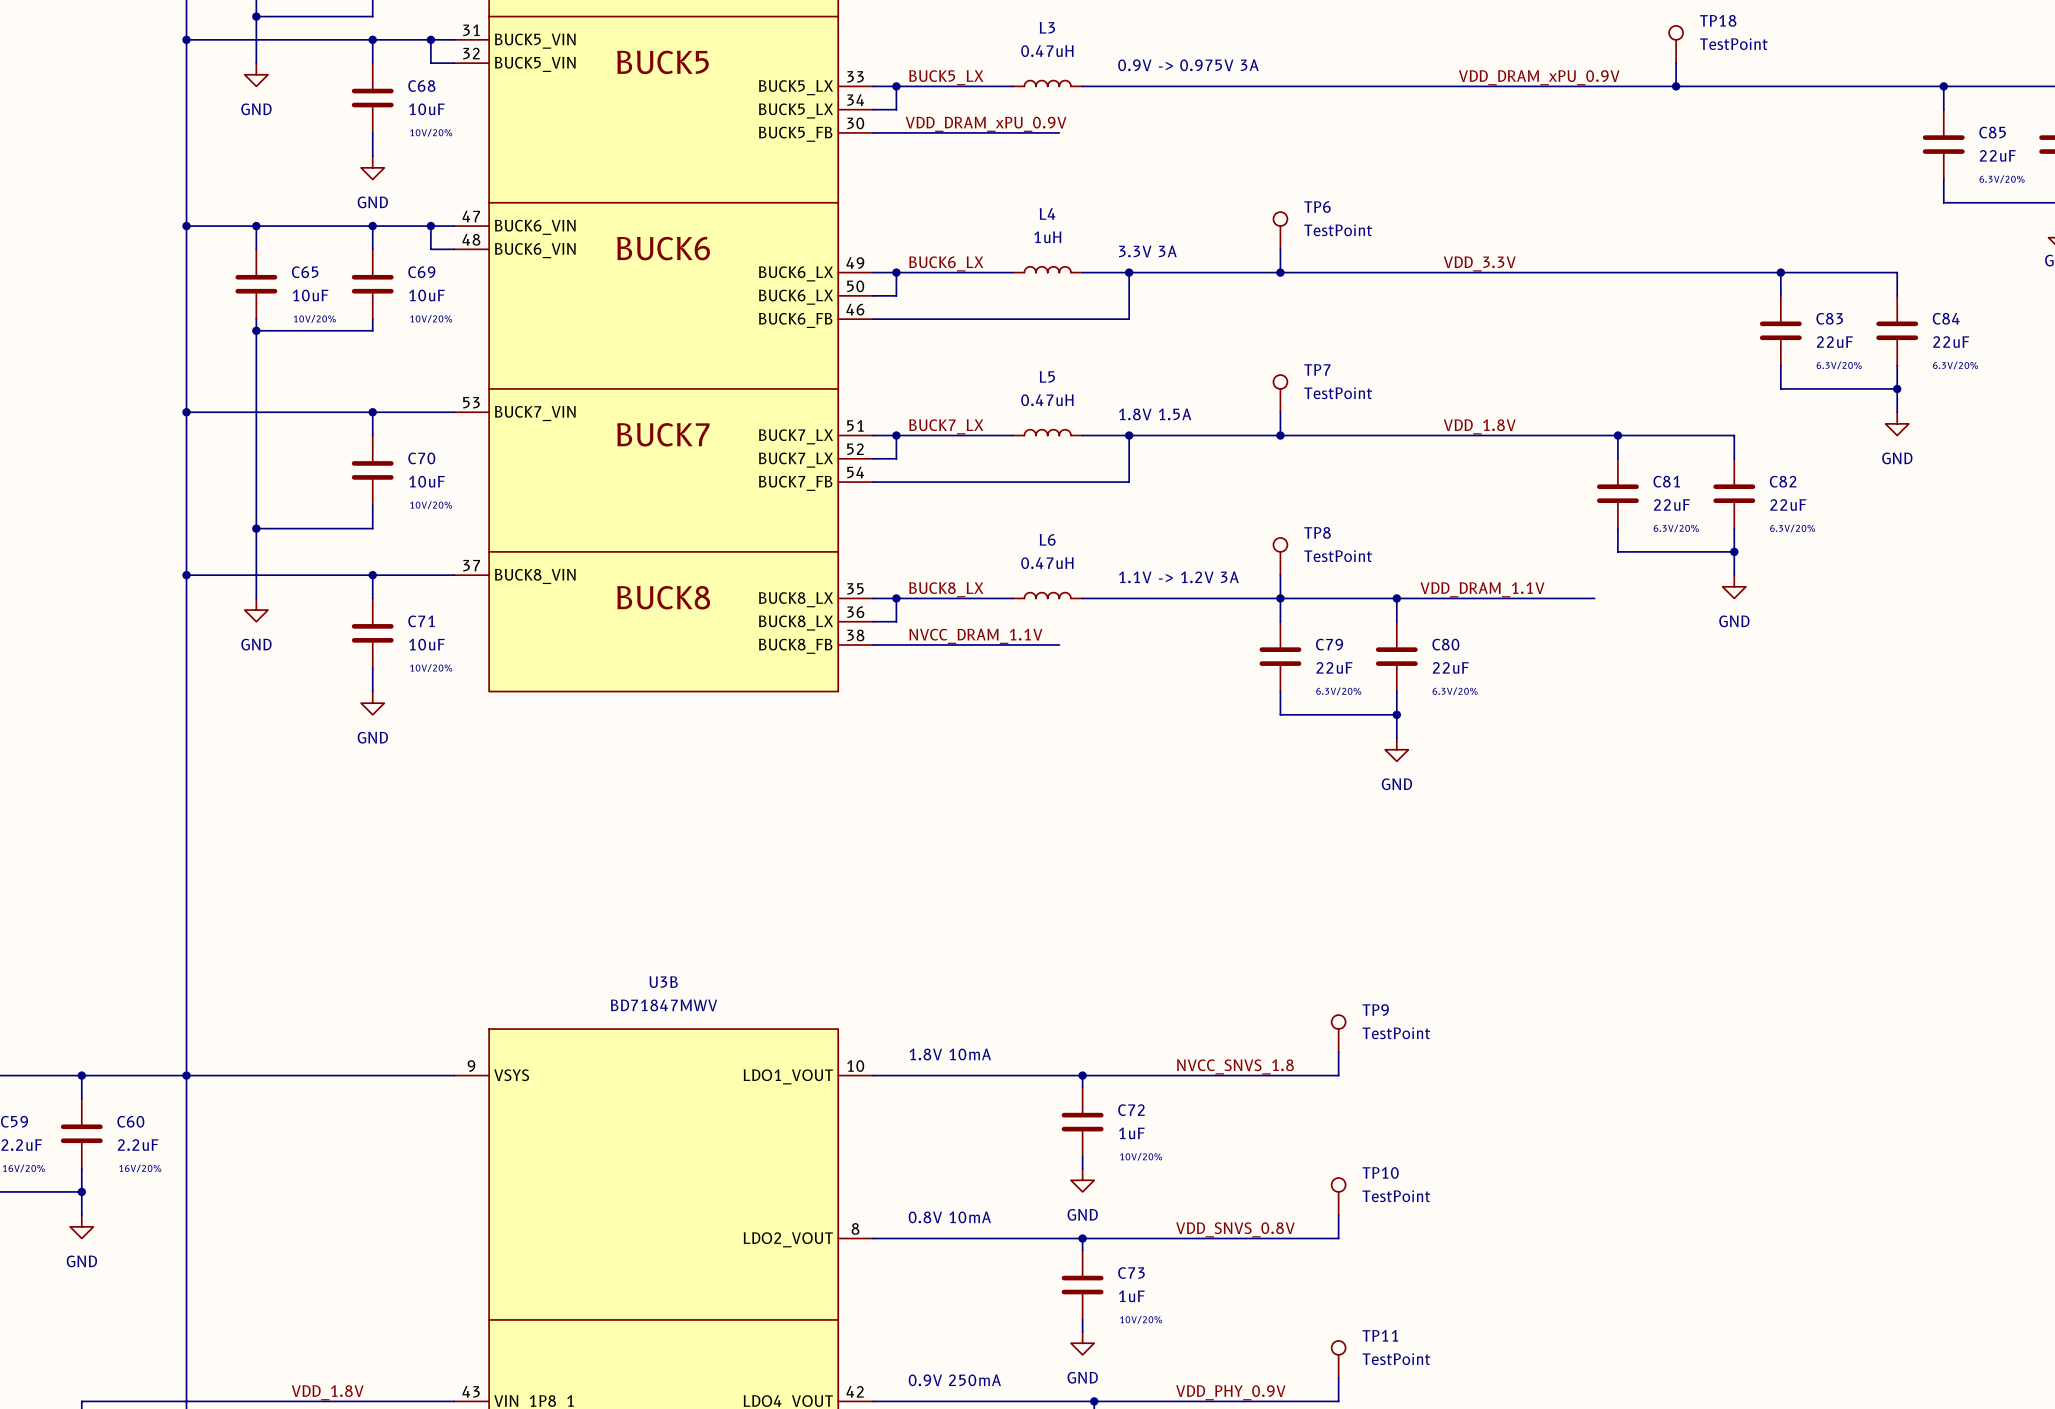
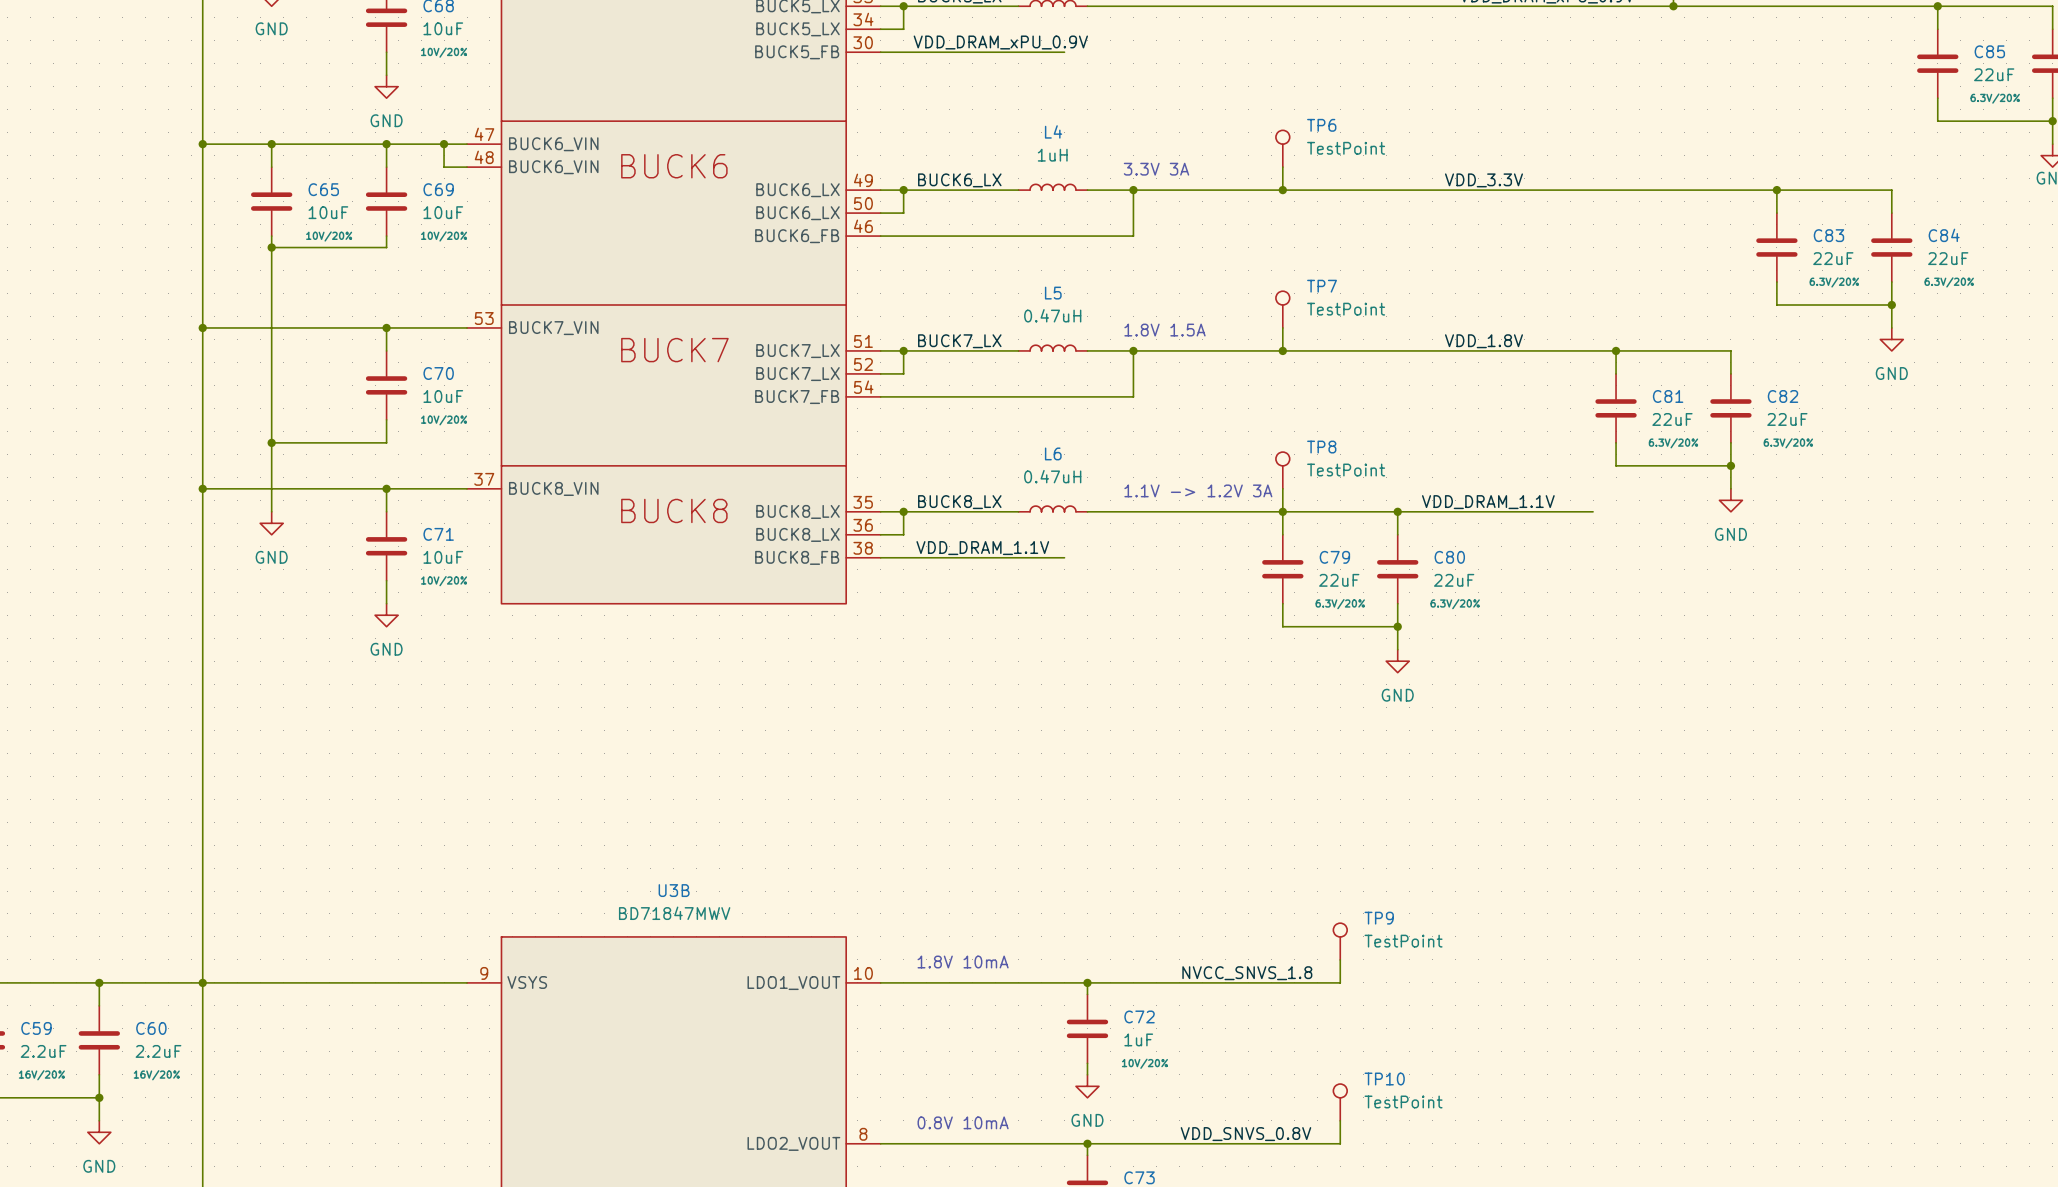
label: NVCC_DRAM_1.1V (975, 636) -> VDD_DRAM_1.1V (982, 548)

